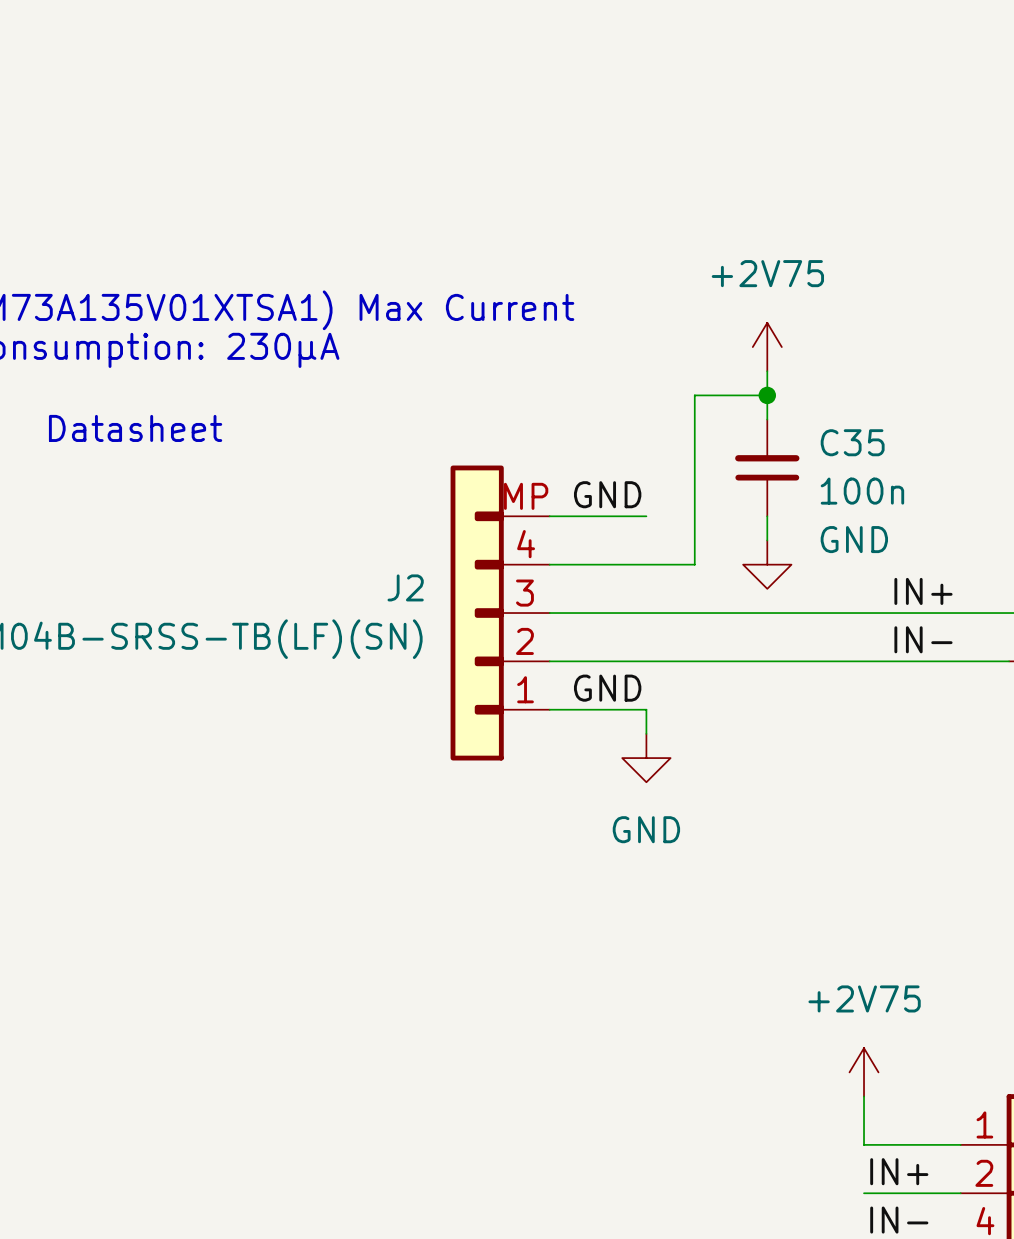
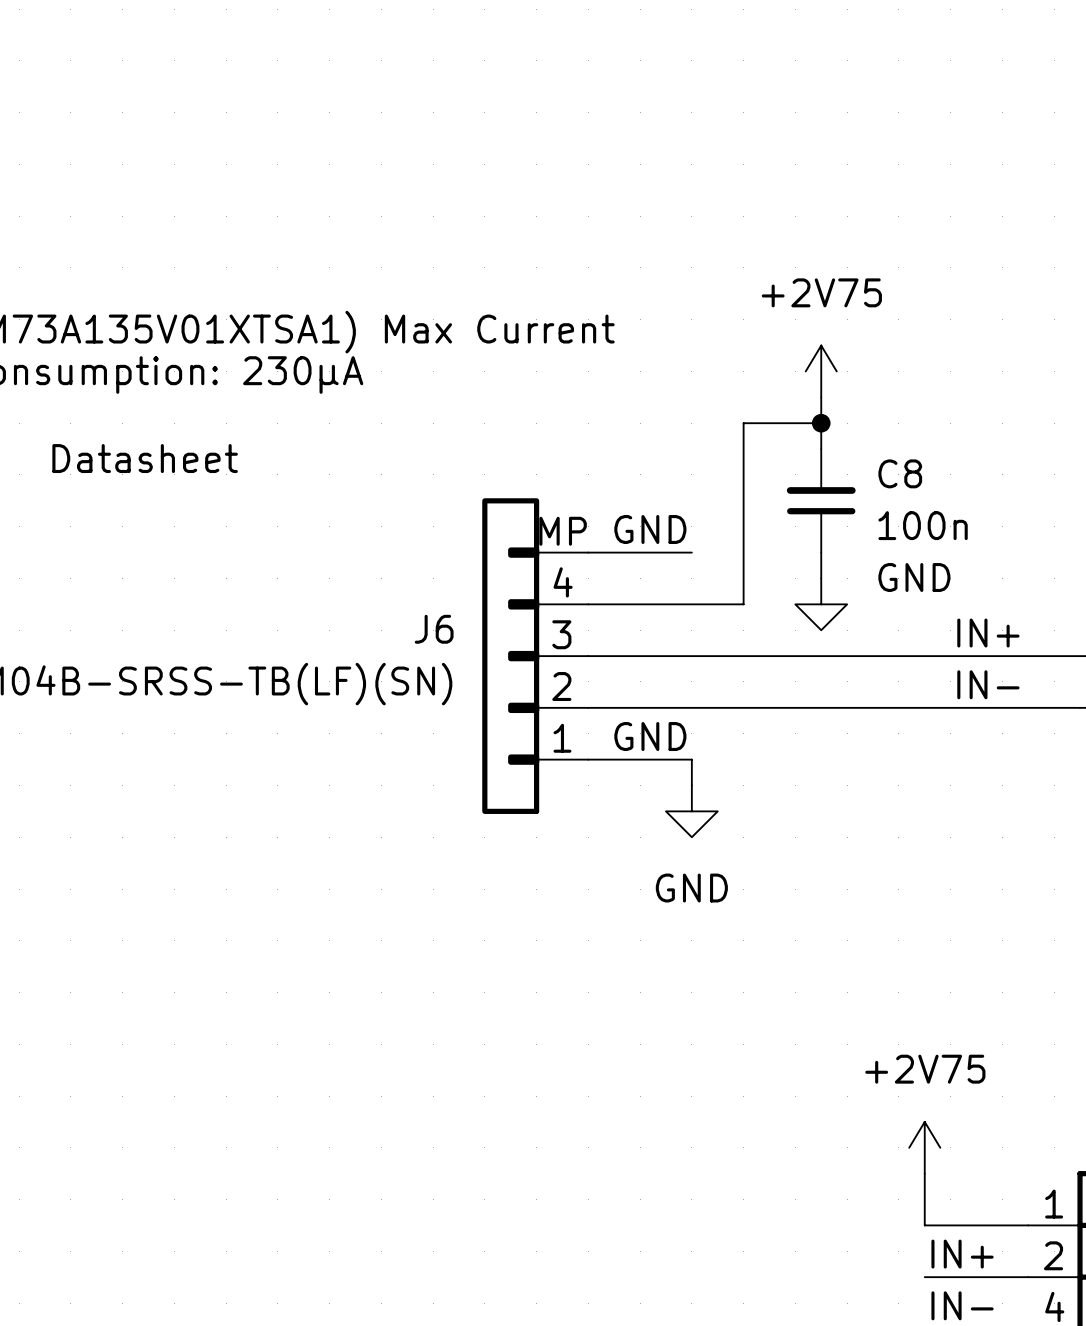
C35 name: C35 (852, 442) -> C8 (900, 473)
J2 name: J2 (405, 587) -> J6 (434, 629)

